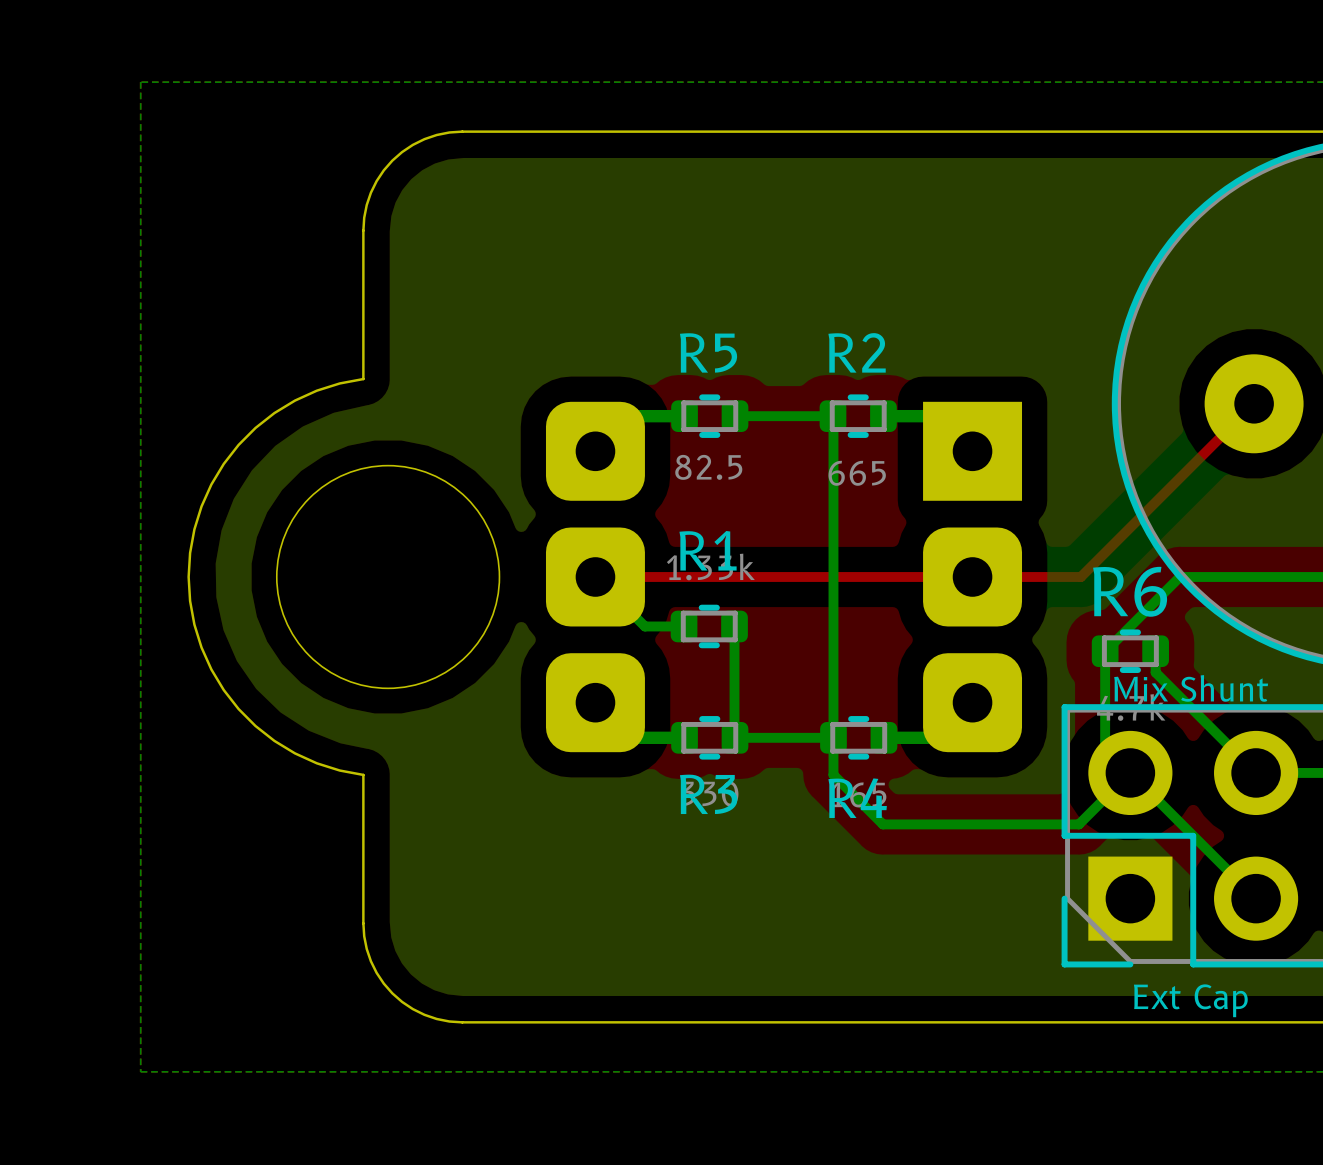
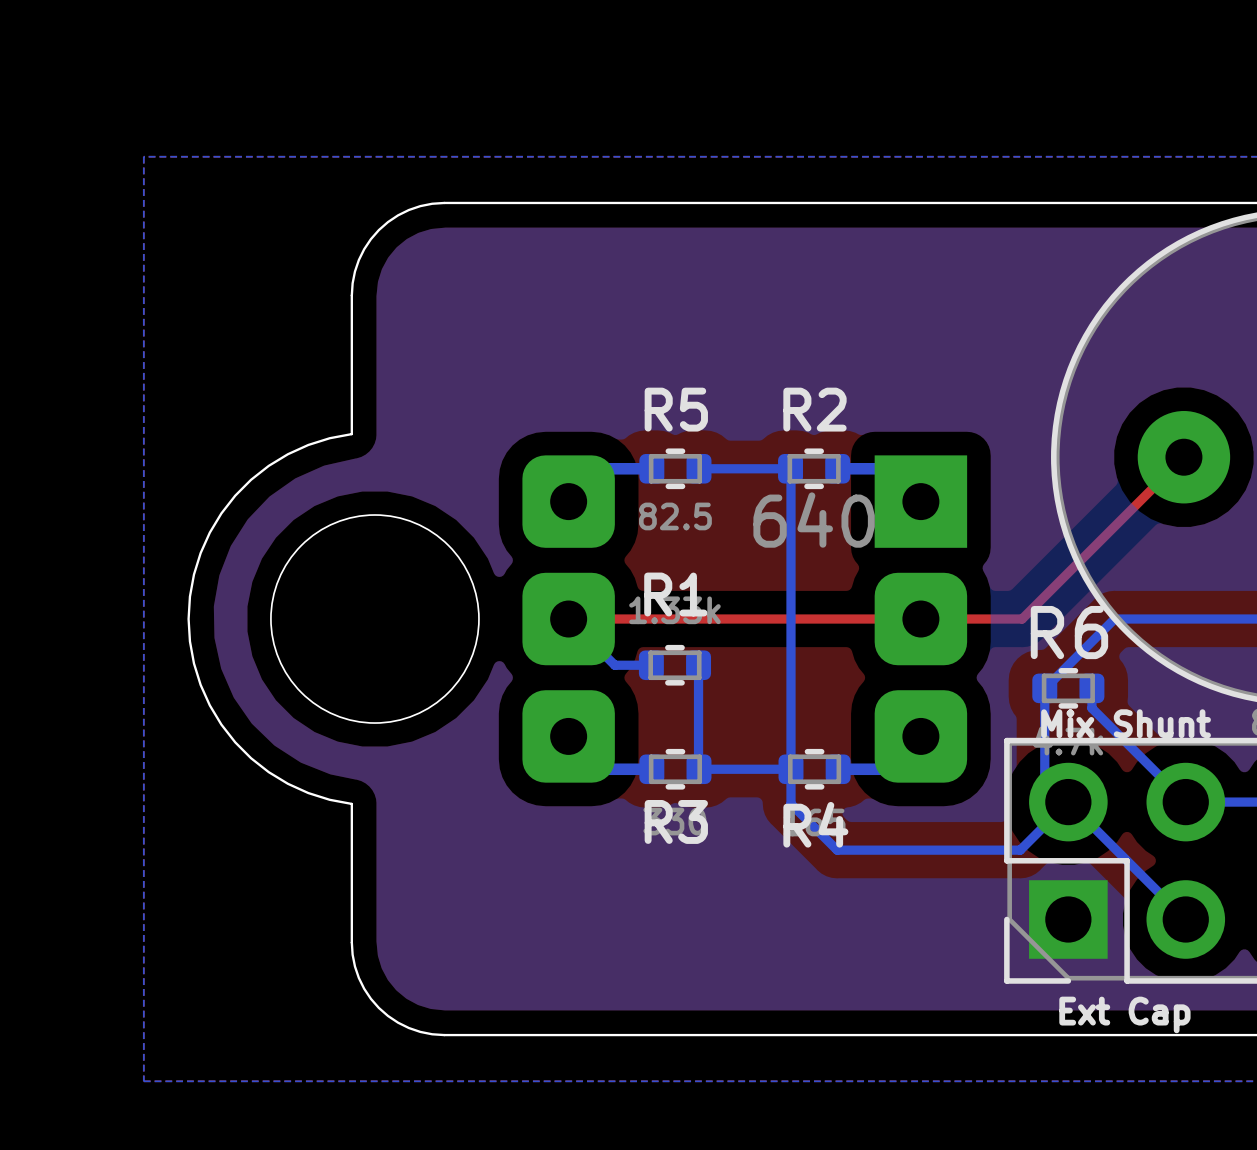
R2 value: 665 (857, 473) -> 640 (814, 520)

